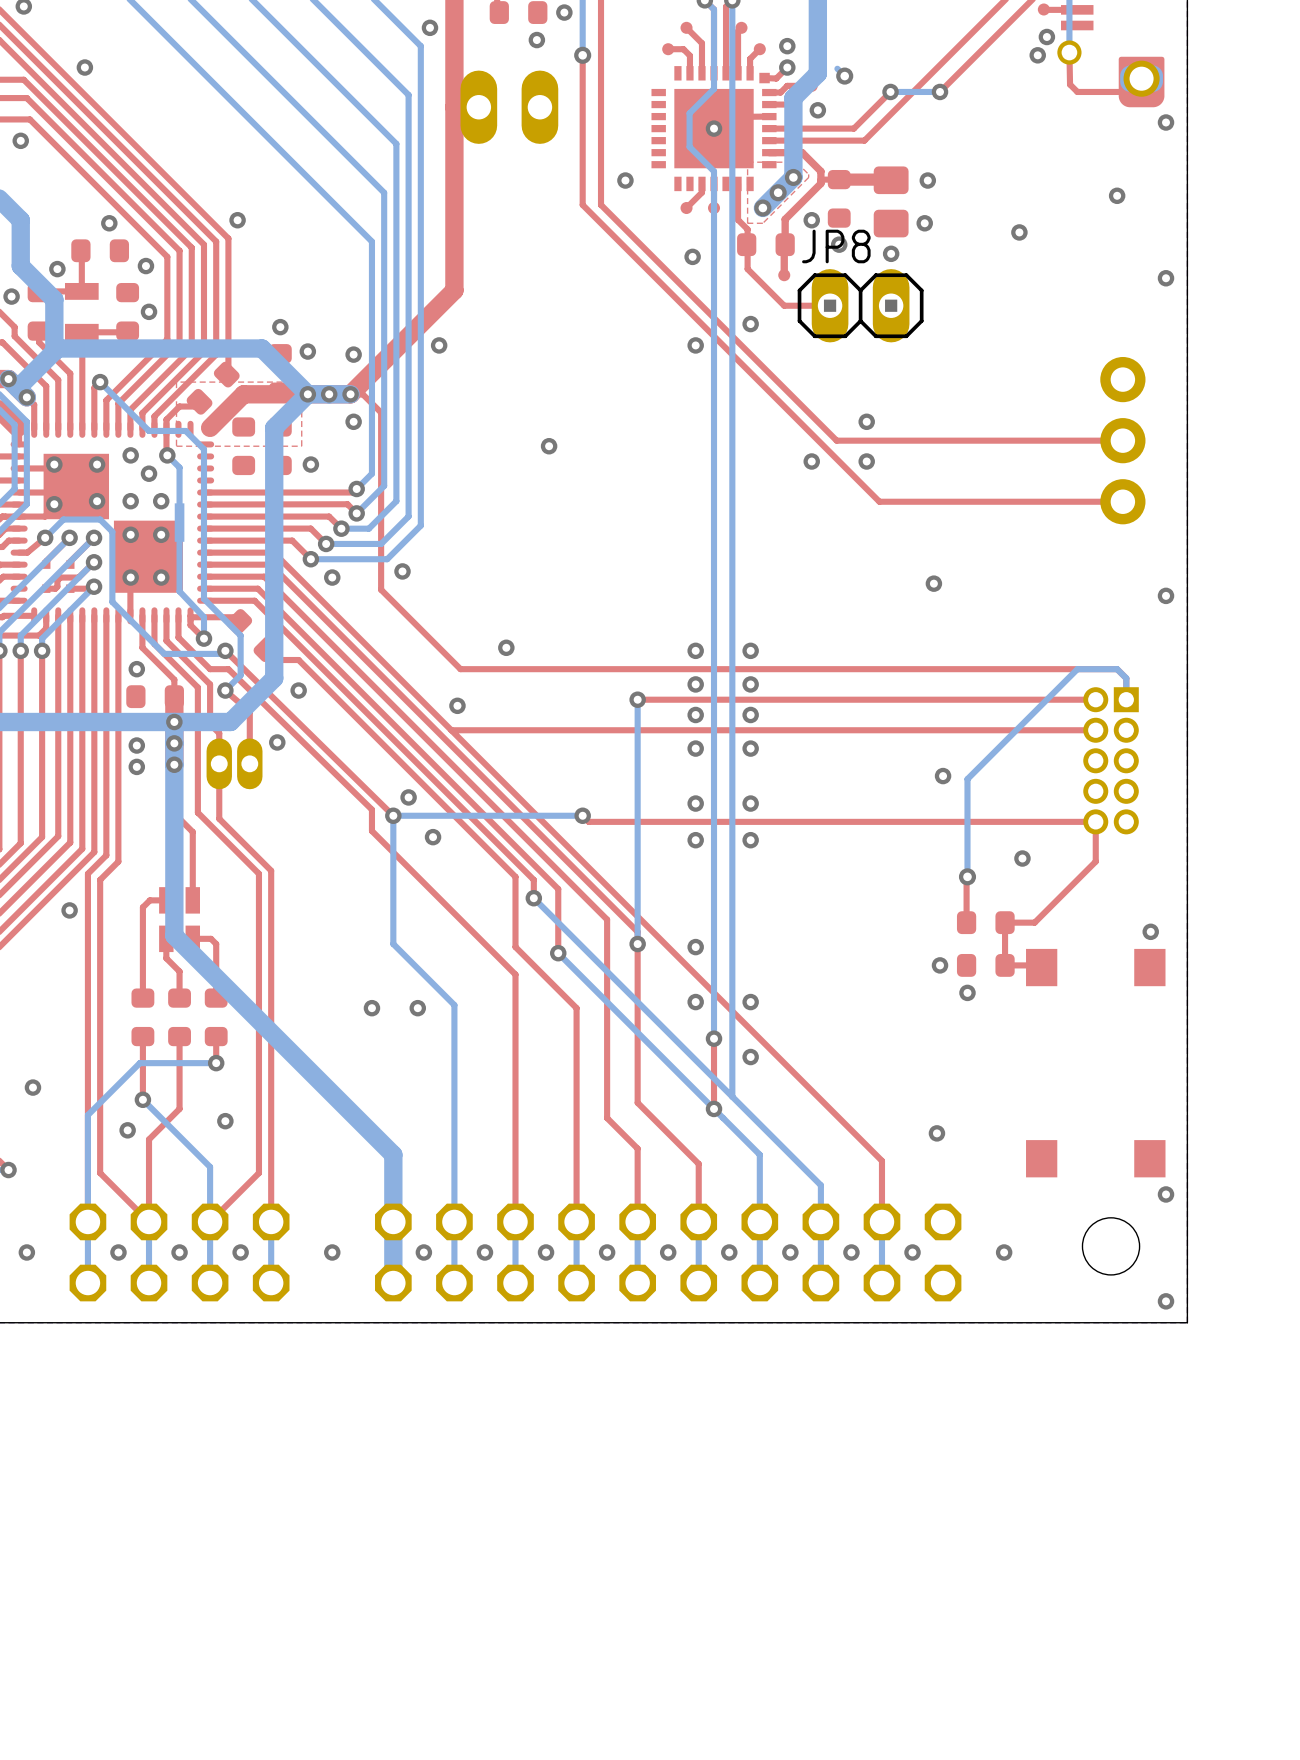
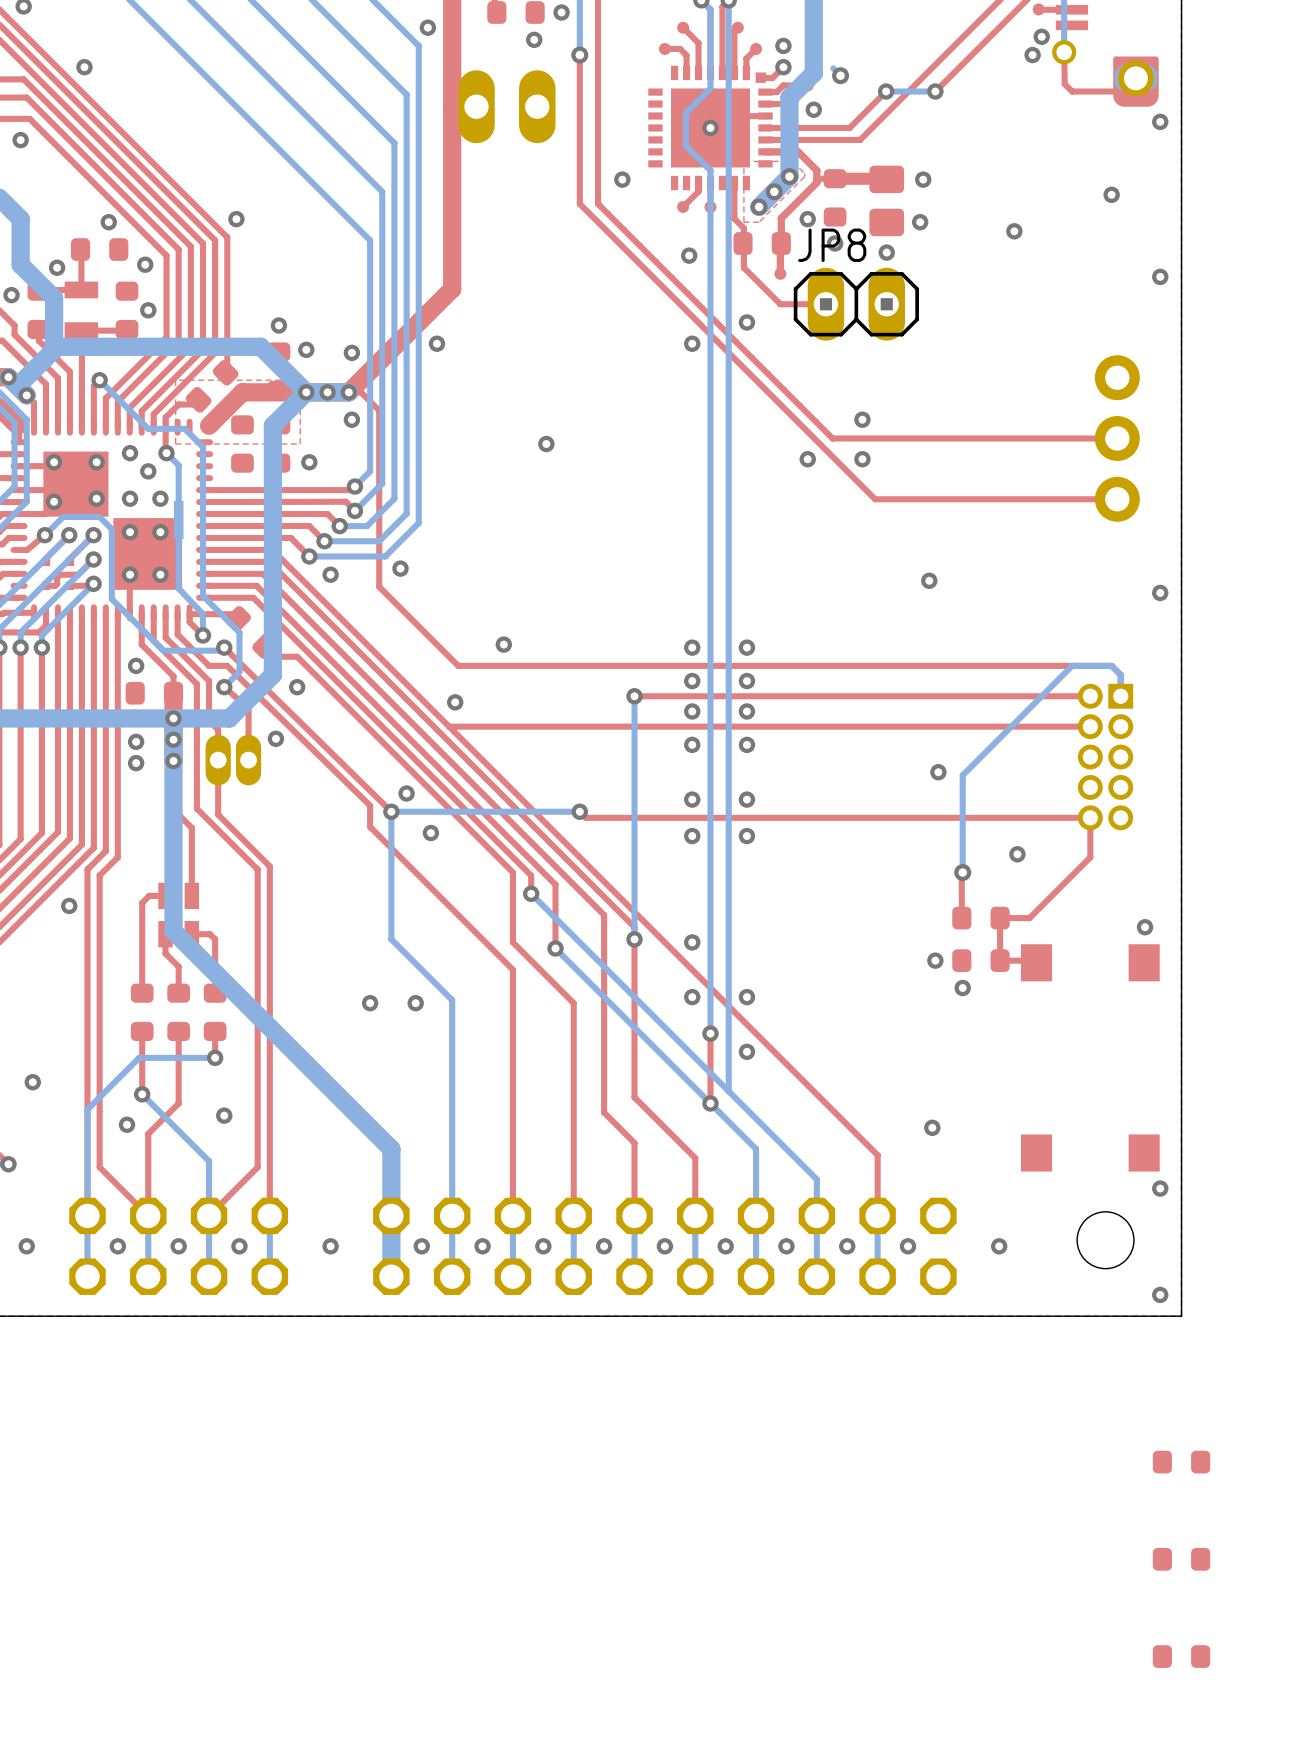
part: none -> (1181, 1462)
part: none -> (1181, 1559)
part: none -> (1181, 1656)

